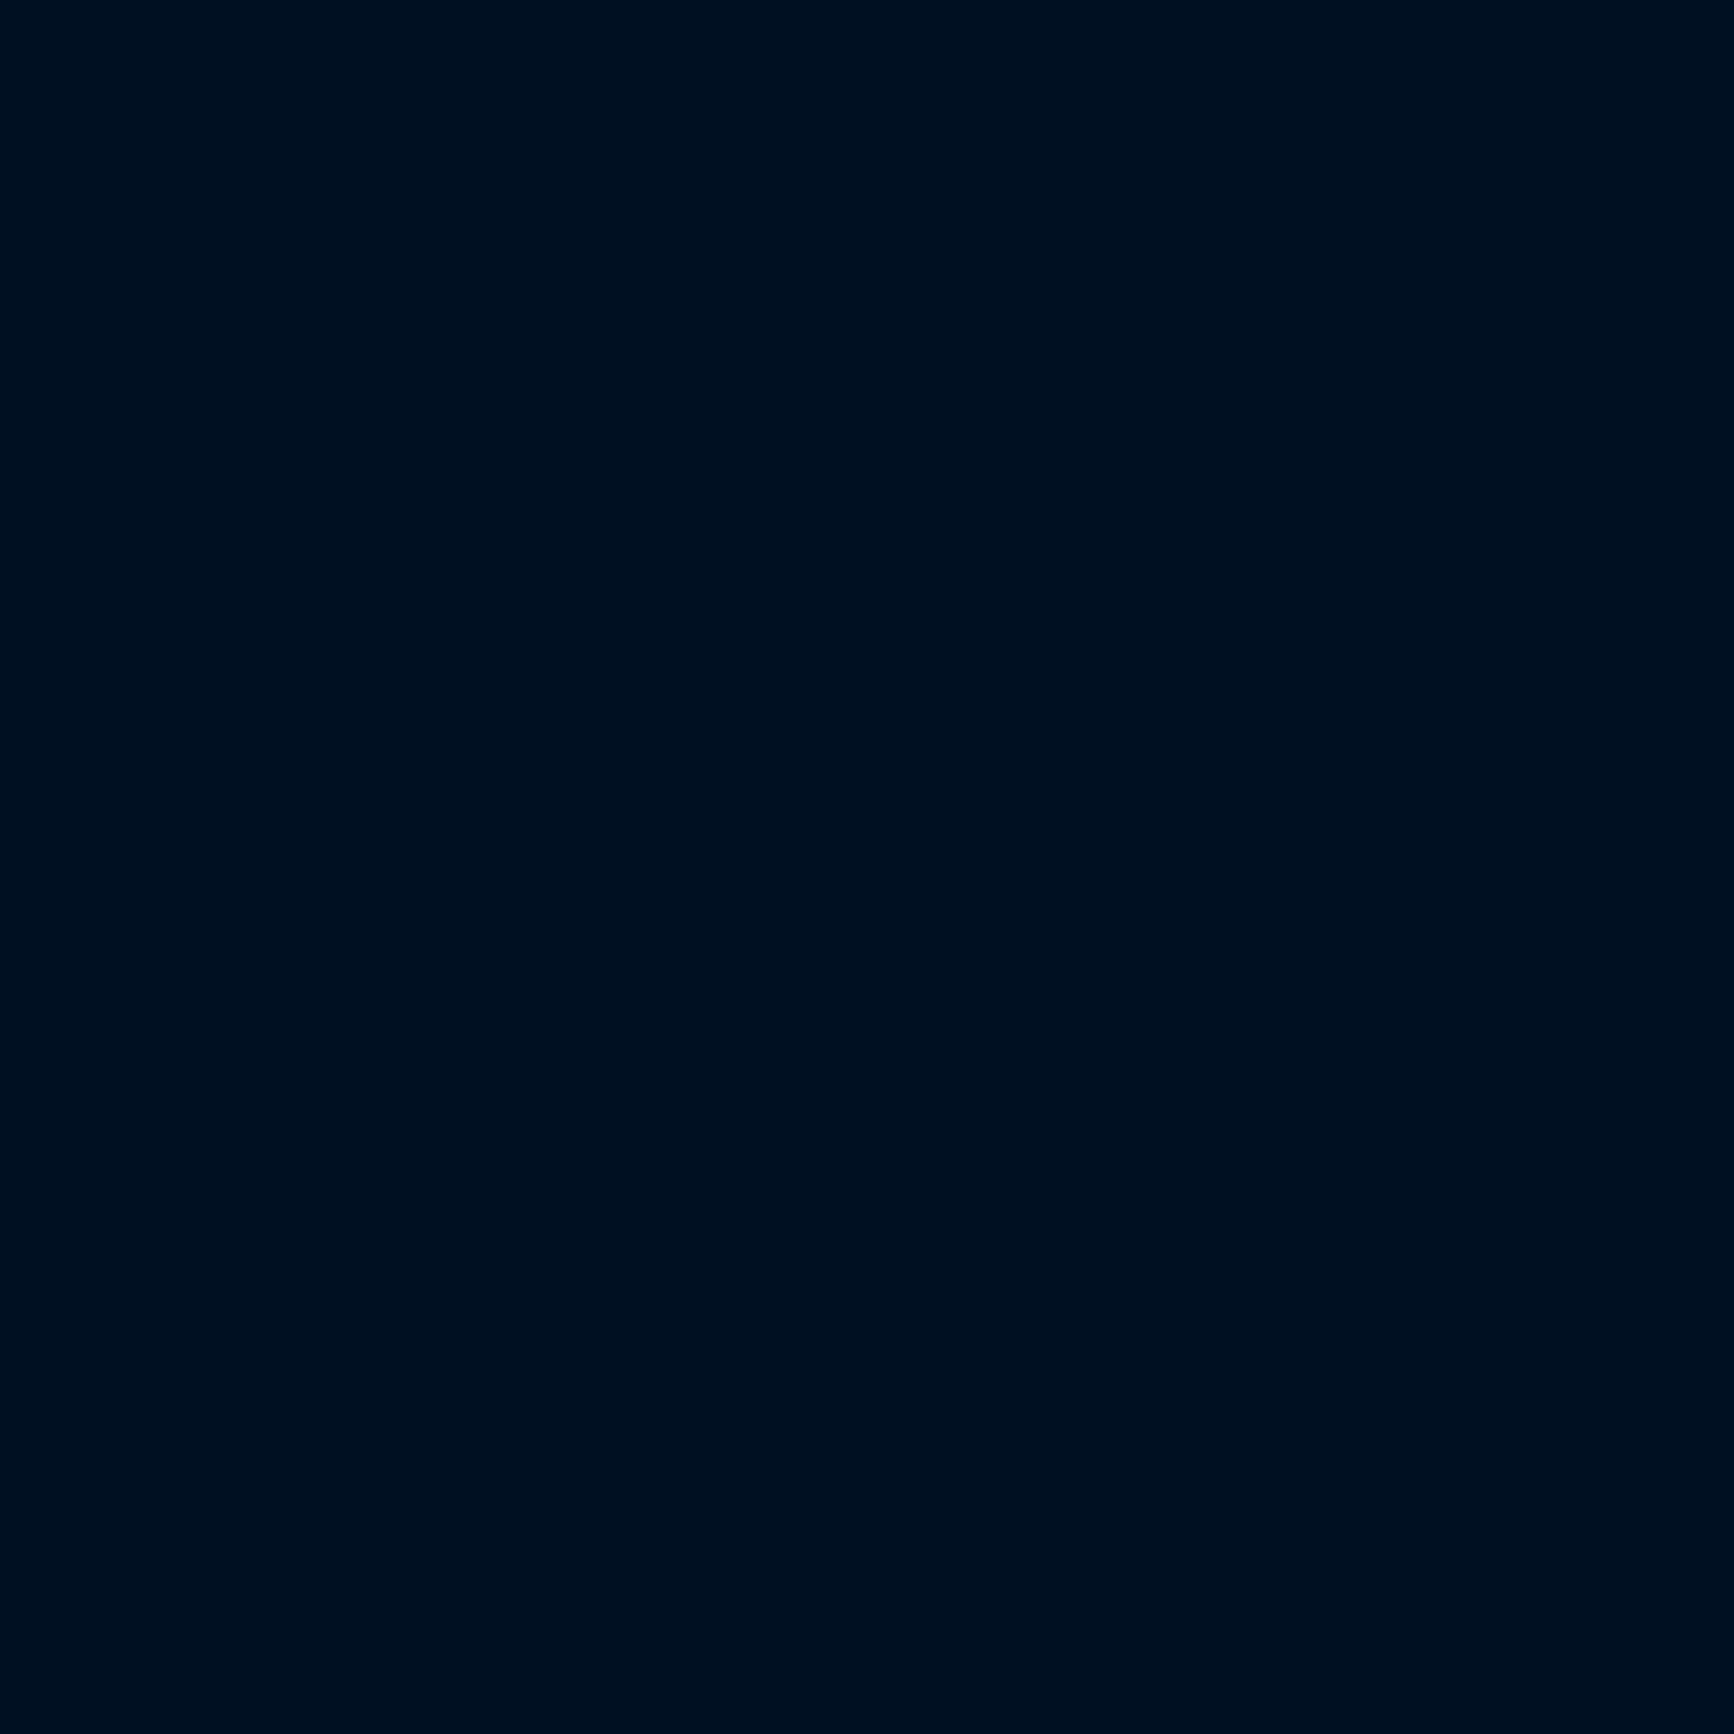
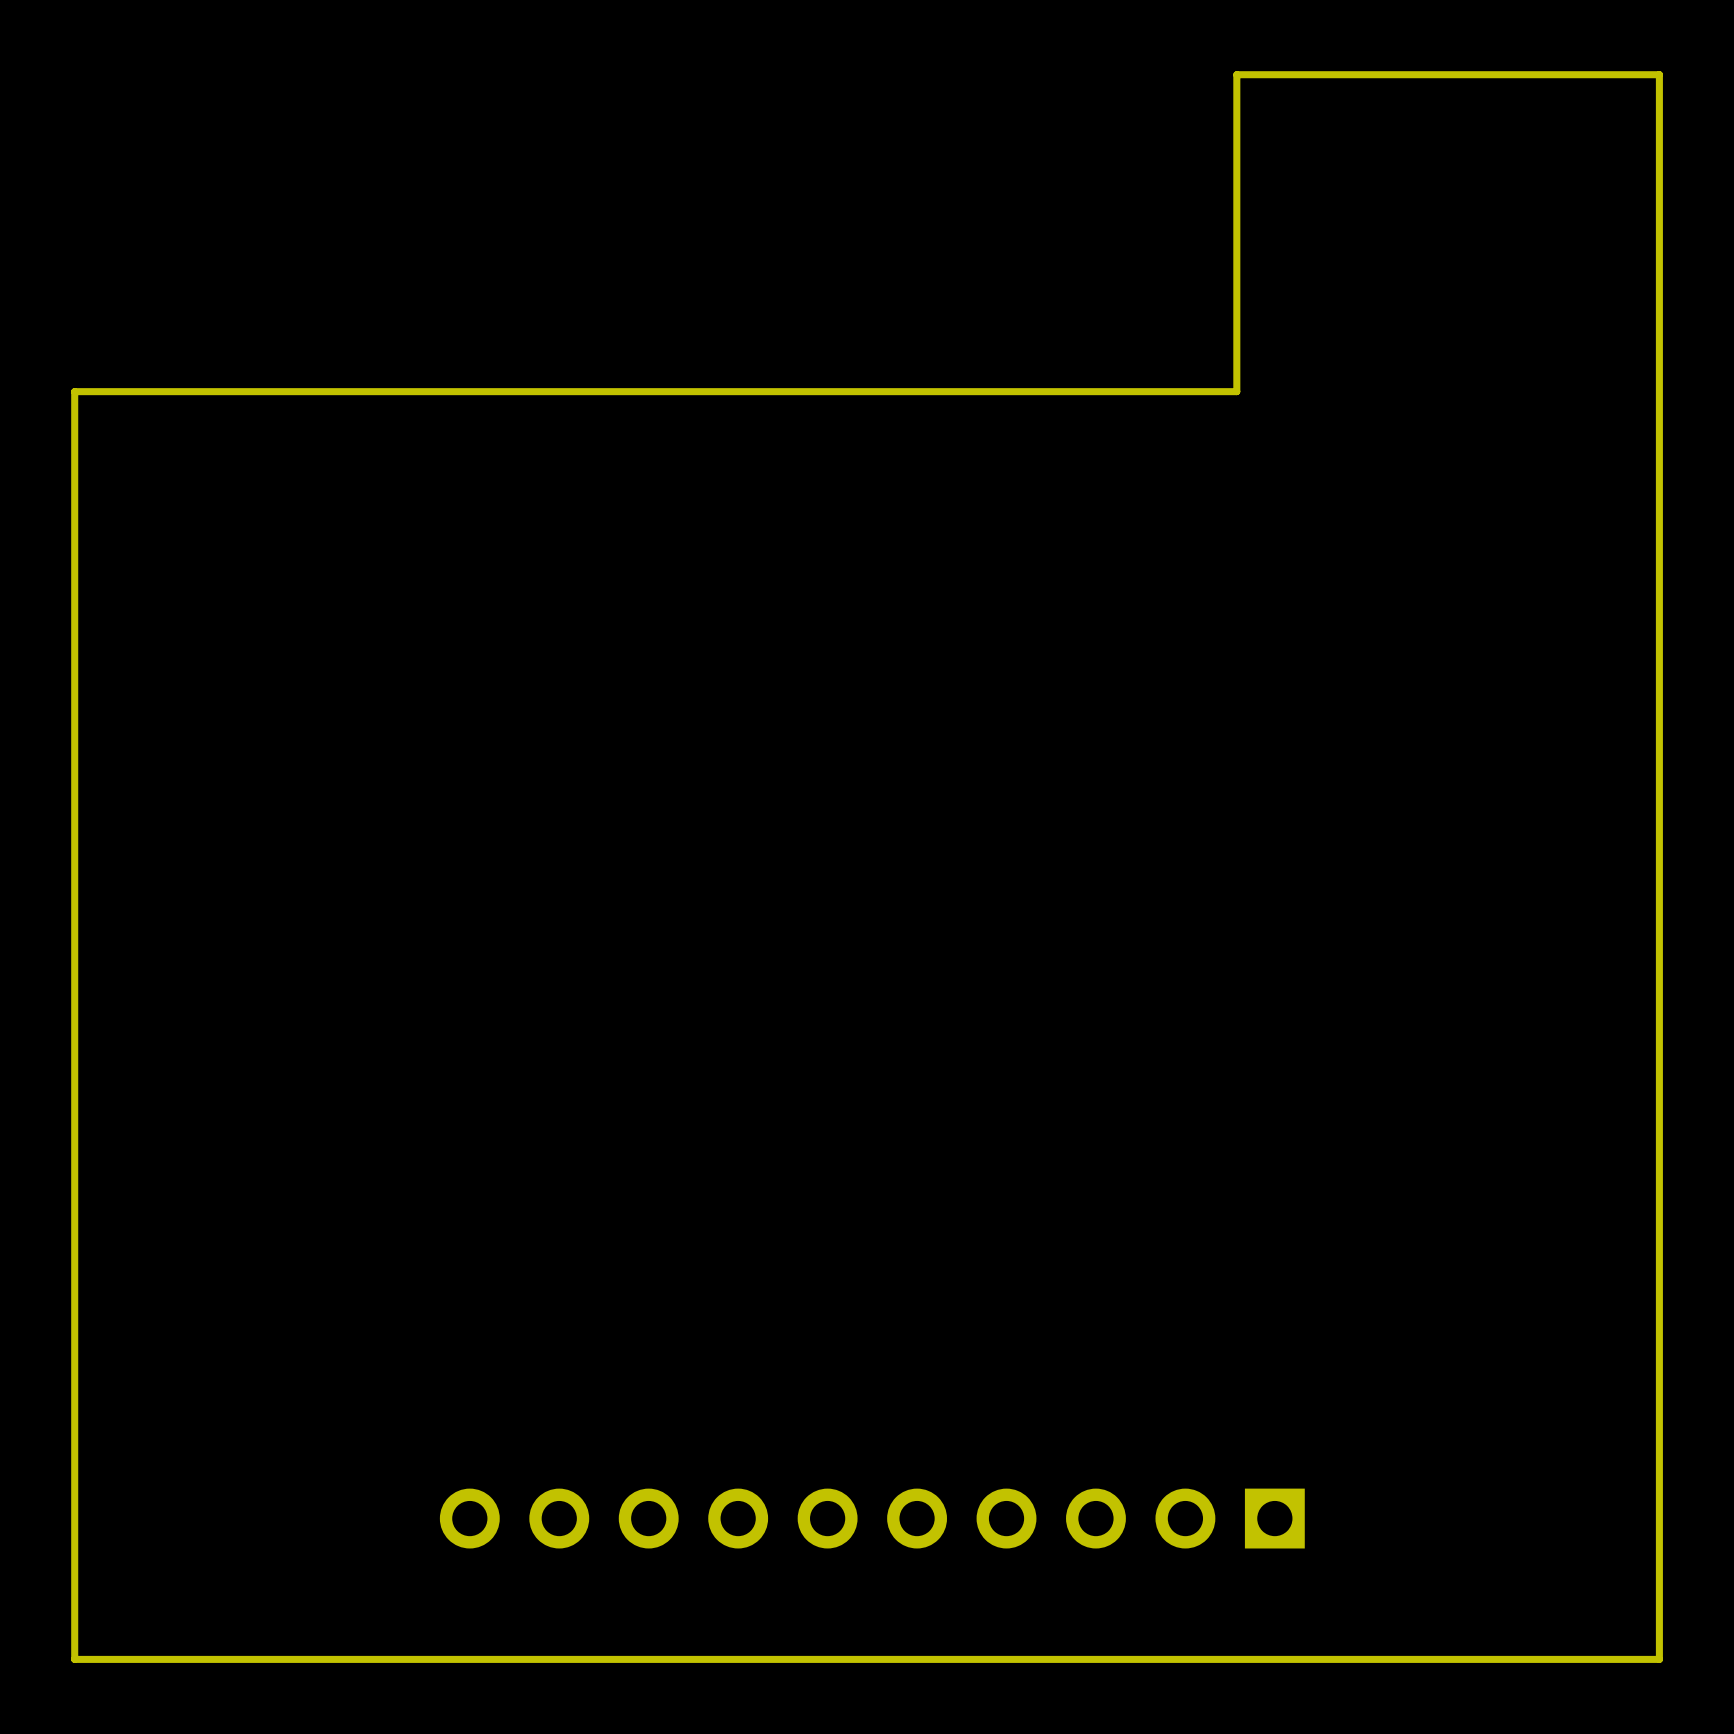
board edge: none -> (1659, 74) (1236, 74) (1236, 391) (74, 391) (74, 1659) (1659, 1659) (1659, 74)
part: none -> (872, 1518)

